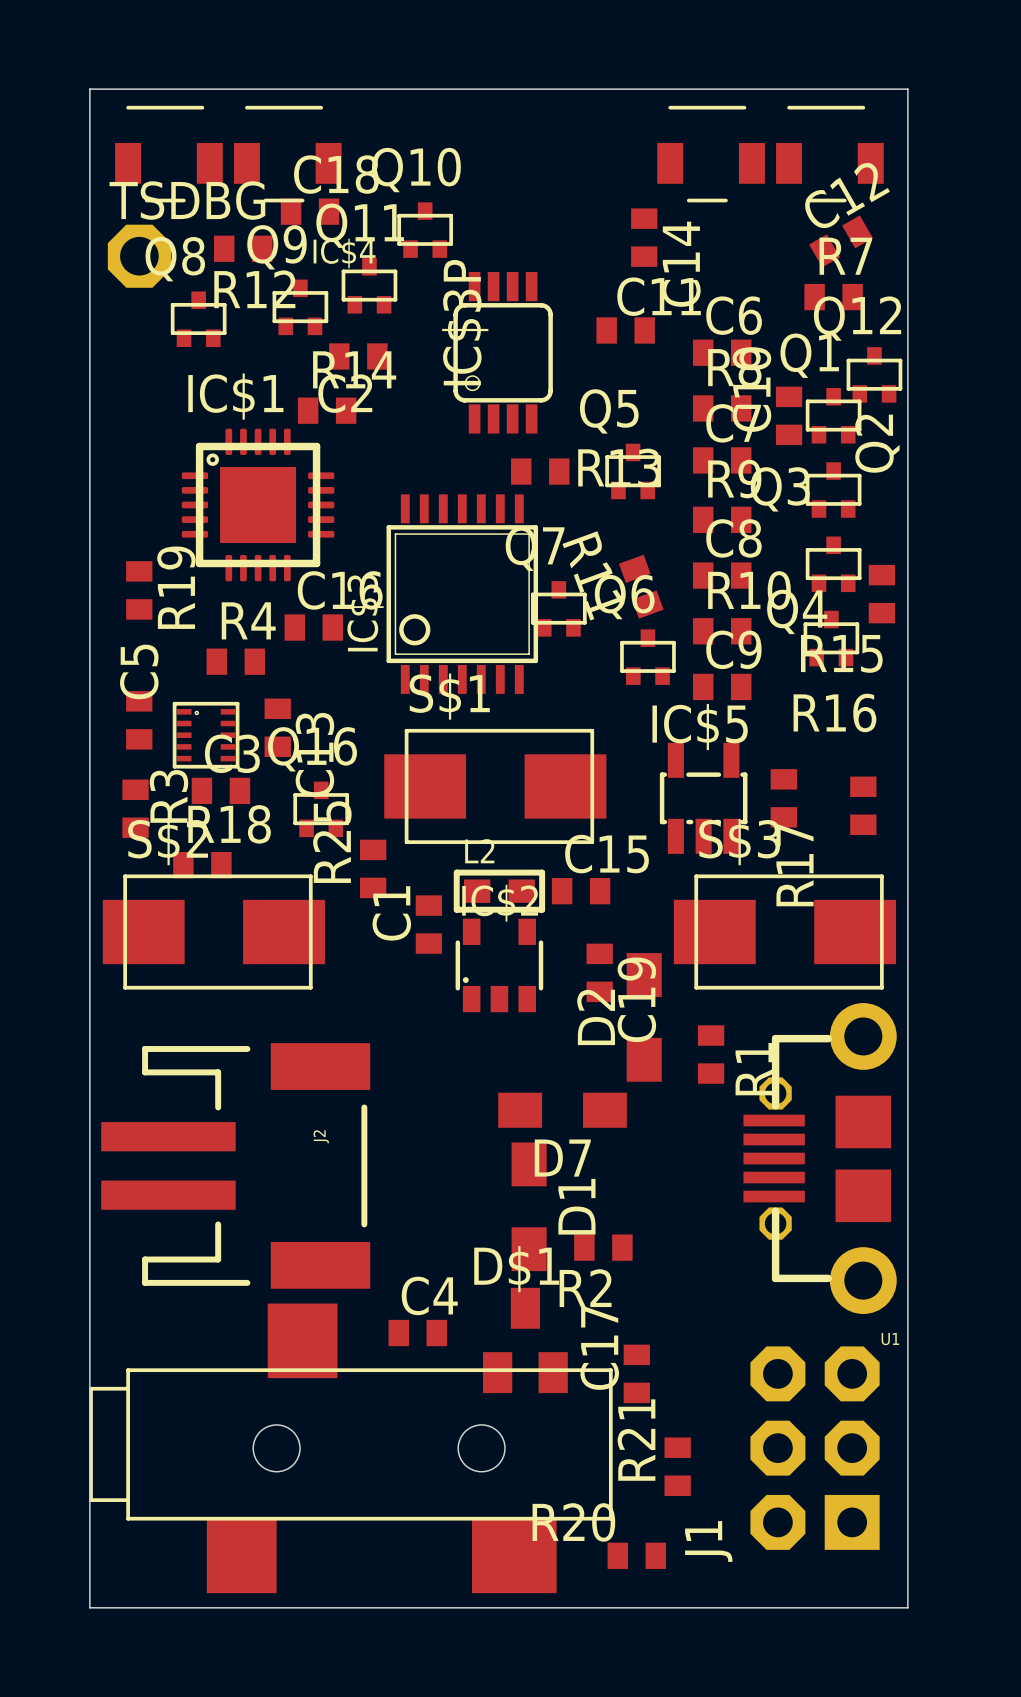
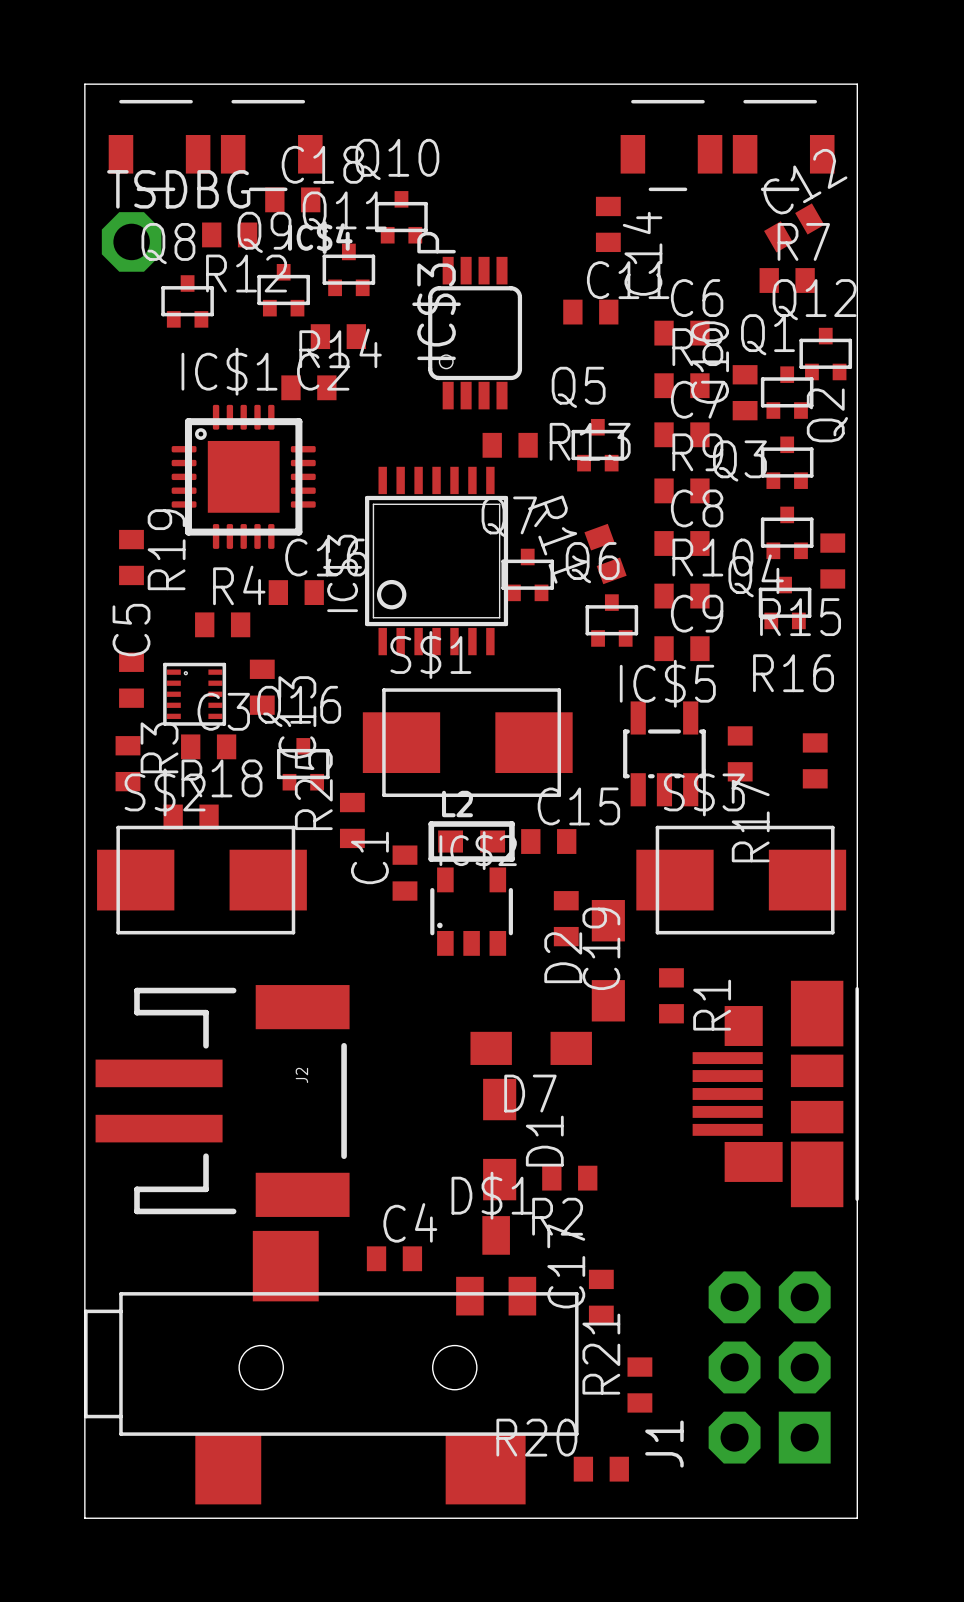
U1: (820, 1158) -> none
part: none -> (775, 1093)

